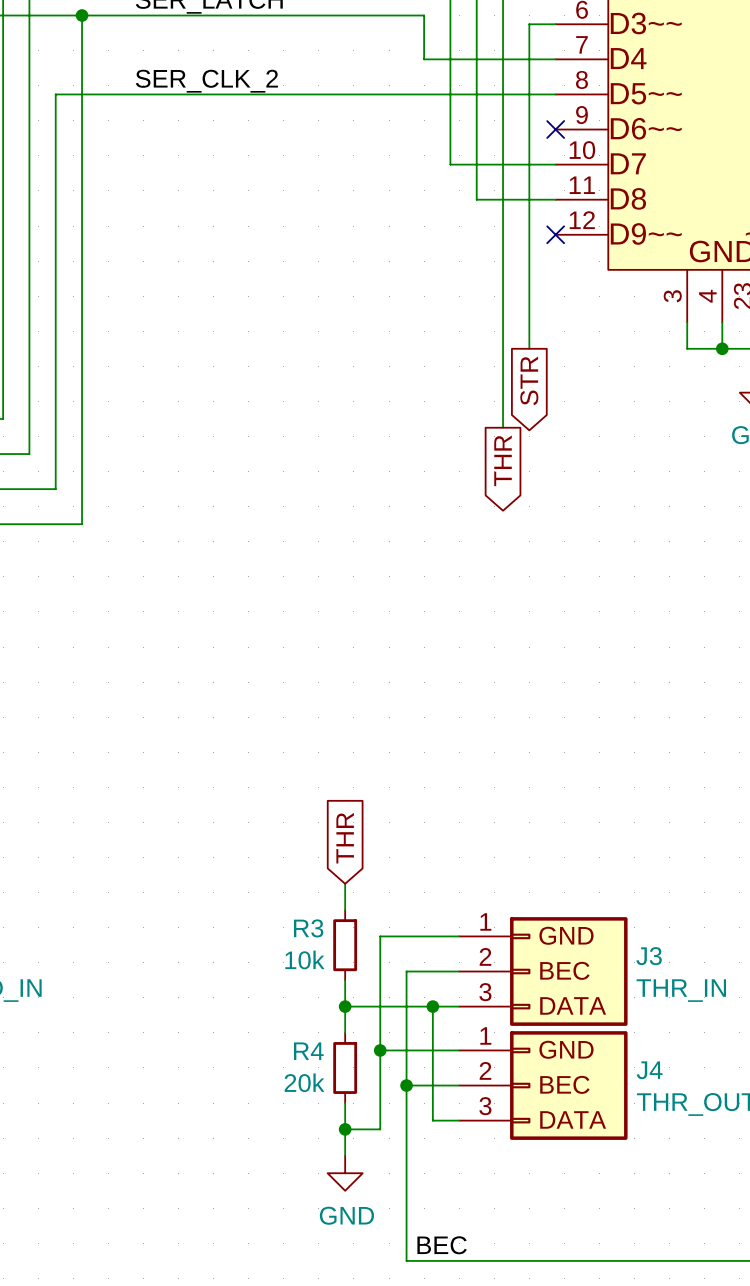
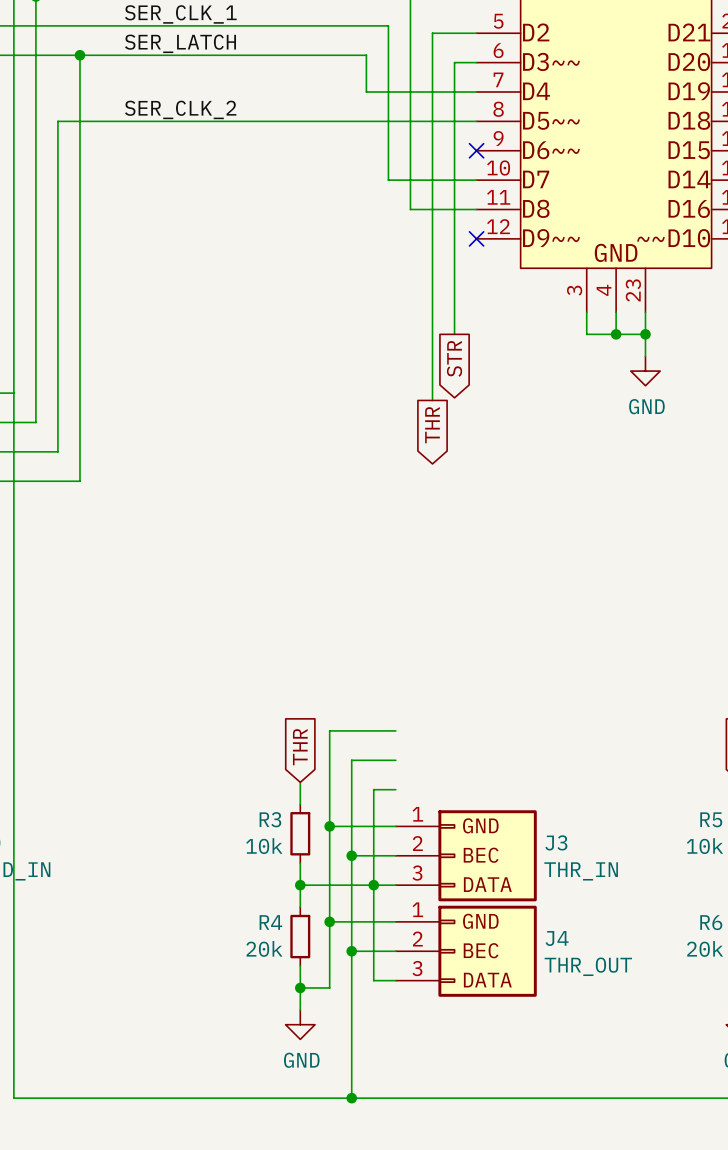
wire: none -> (13, 393) (13, 1098) (351, 1098)
wire: none -> (395, 730) (329, 730) (329, 826)
wire: none -> (395, 760) (351, 760) (351, 855)
wire: none -> (395, 789) (373, 789) (373, 885)
junction: none -> (329, 826)
junction: none -> (351, 855)
label: BEC (442, 1245) -> none
junction: none -> (351, 1098)

